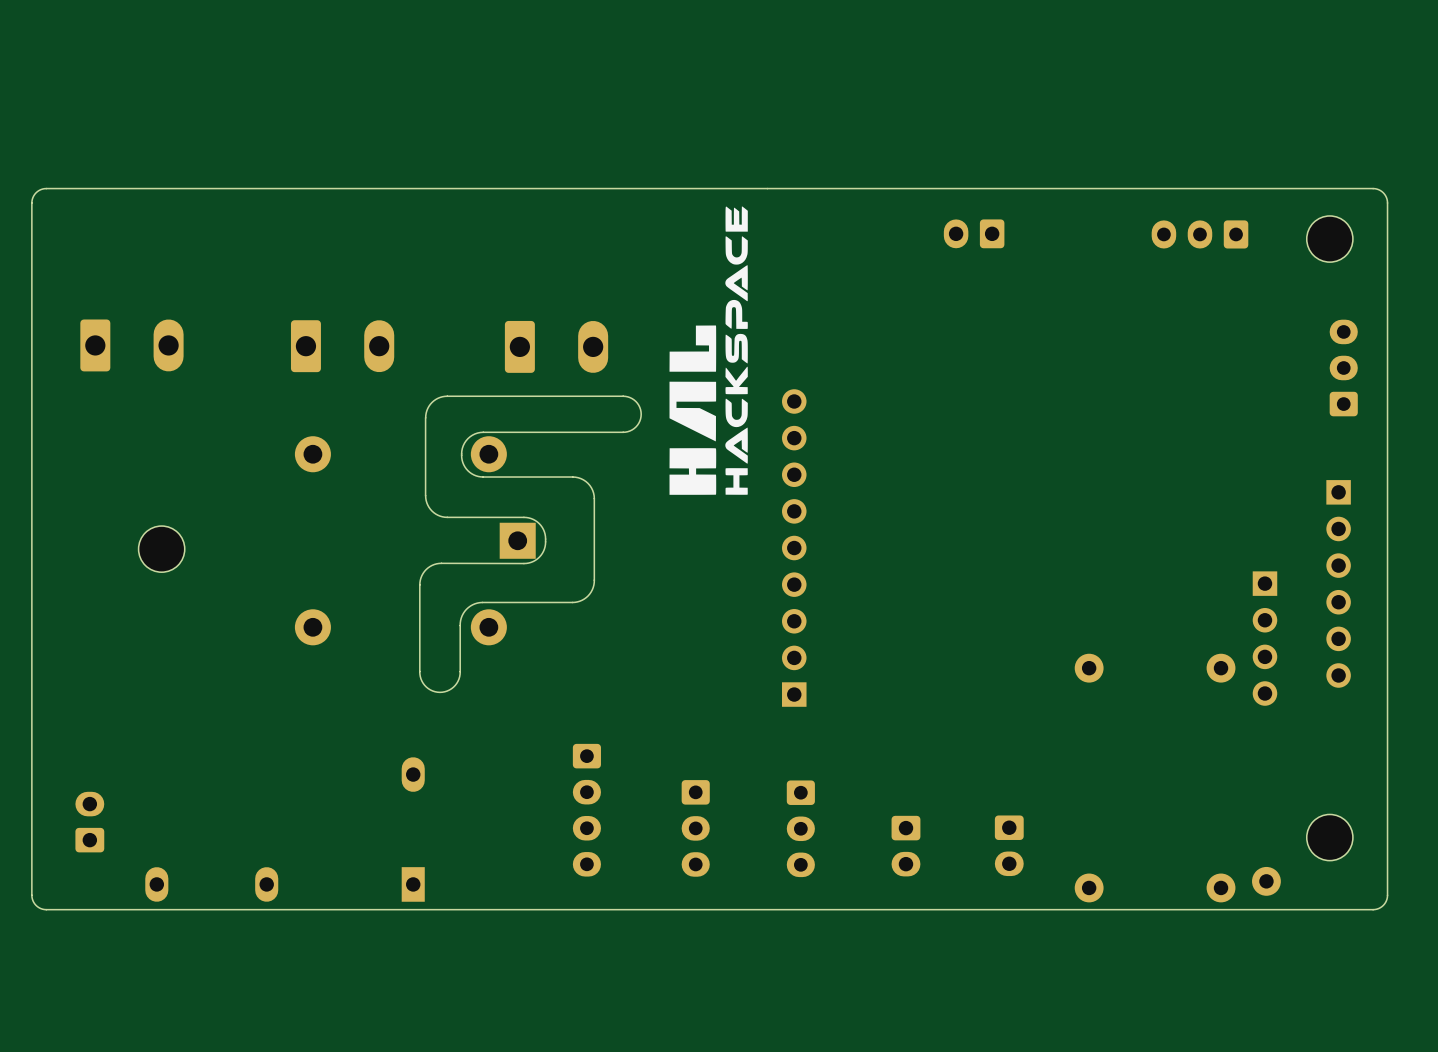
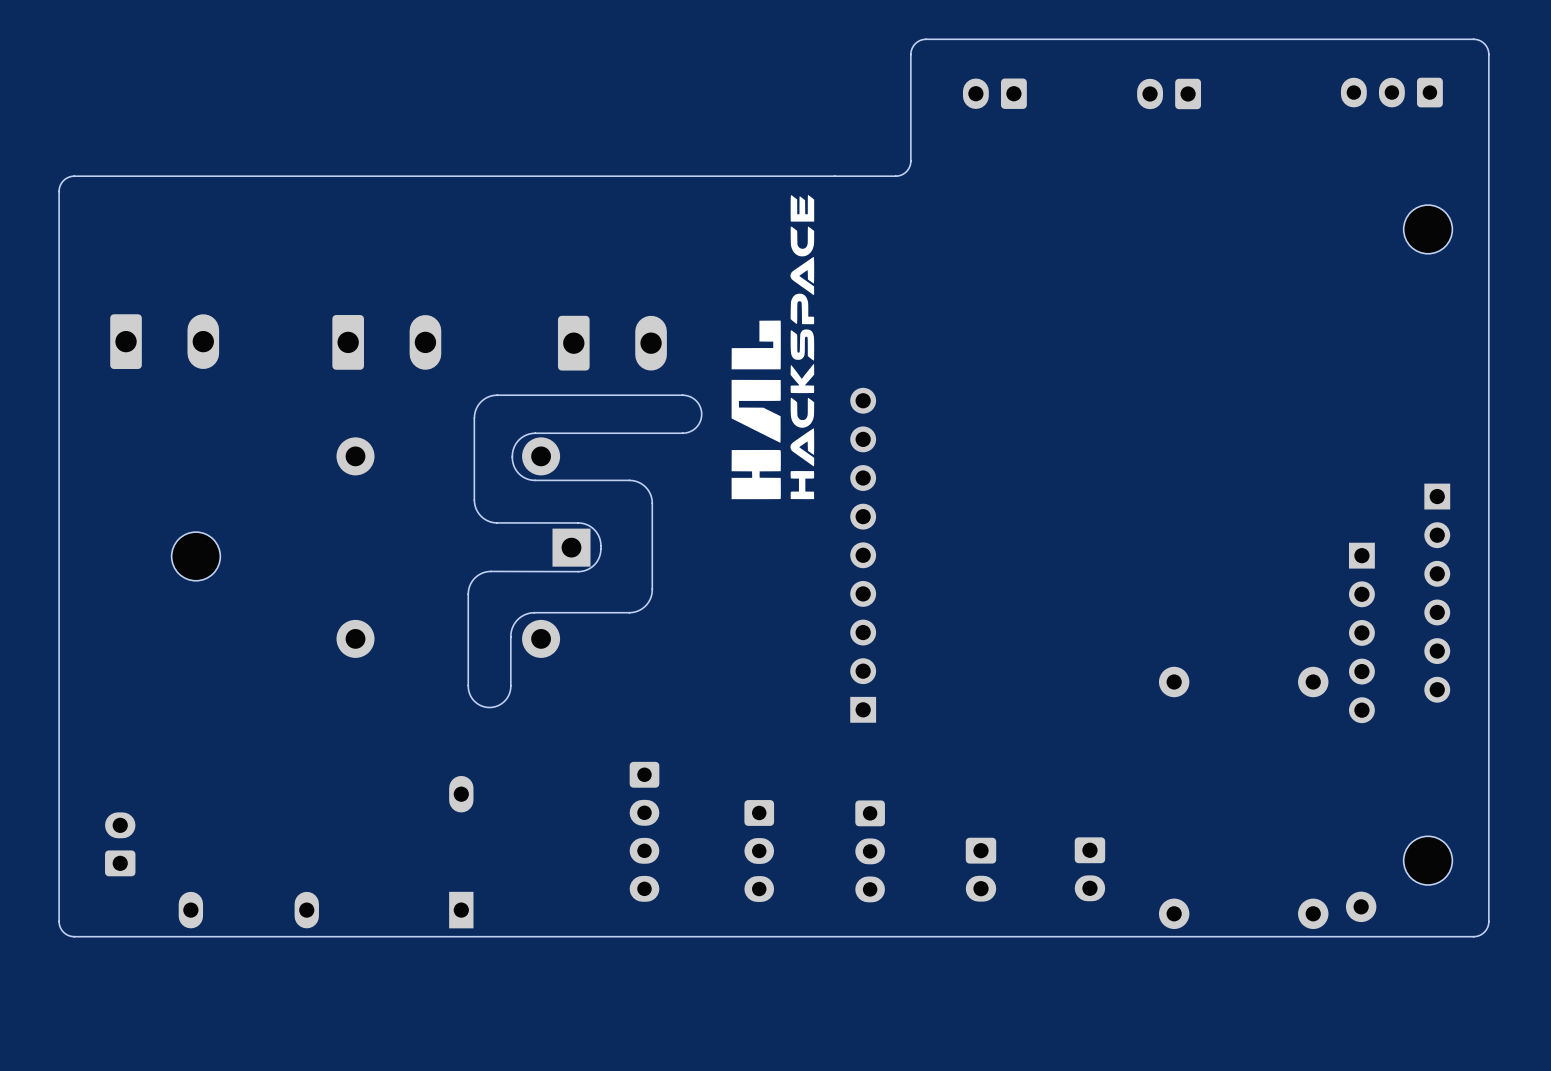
part: none -> (1391, 92)
part: none -> (994, 93)
part: none -> (1169, 93)
board edge: (825, 188) (1373, 188) (1383, 192) (1387, 202) -> (895, 176) (904, 173) (910, 162) (911, 52) (915, 43) (922, 39) (1473, 39) (1482, 42) (1488, 52) (1488, 191)
part: (974, 233) -> none
part: (1199, 234) -> none
part: (1343, 368) -> none
part: none -> (1361, 632)
part: (1264, 638) -> none

